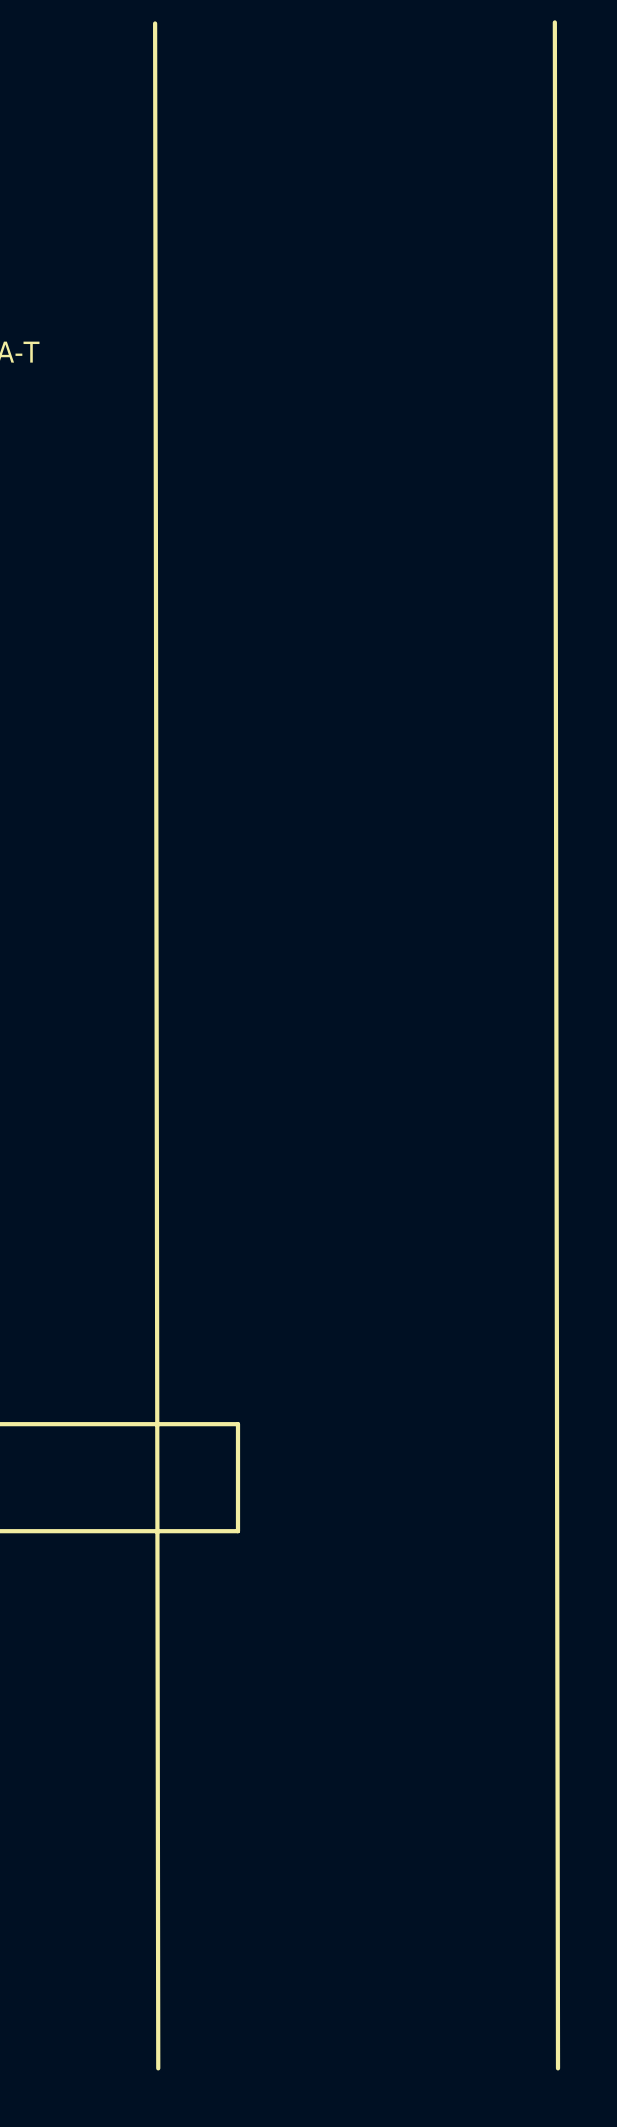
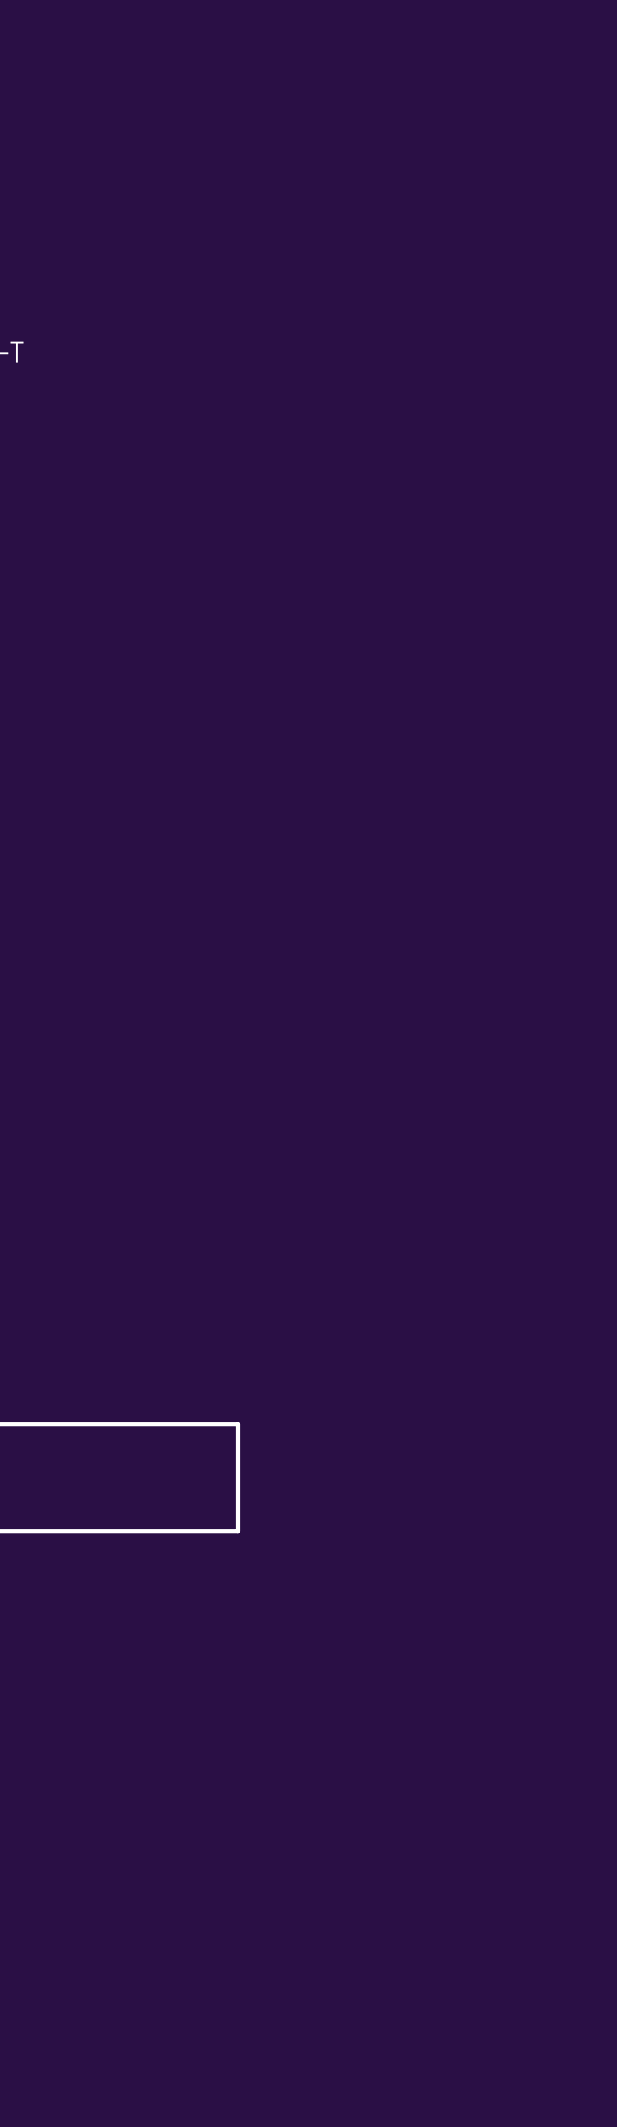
line: (554, 22) (558, 2068) -> none
line: (155, 23) (158, 2068) -> none

